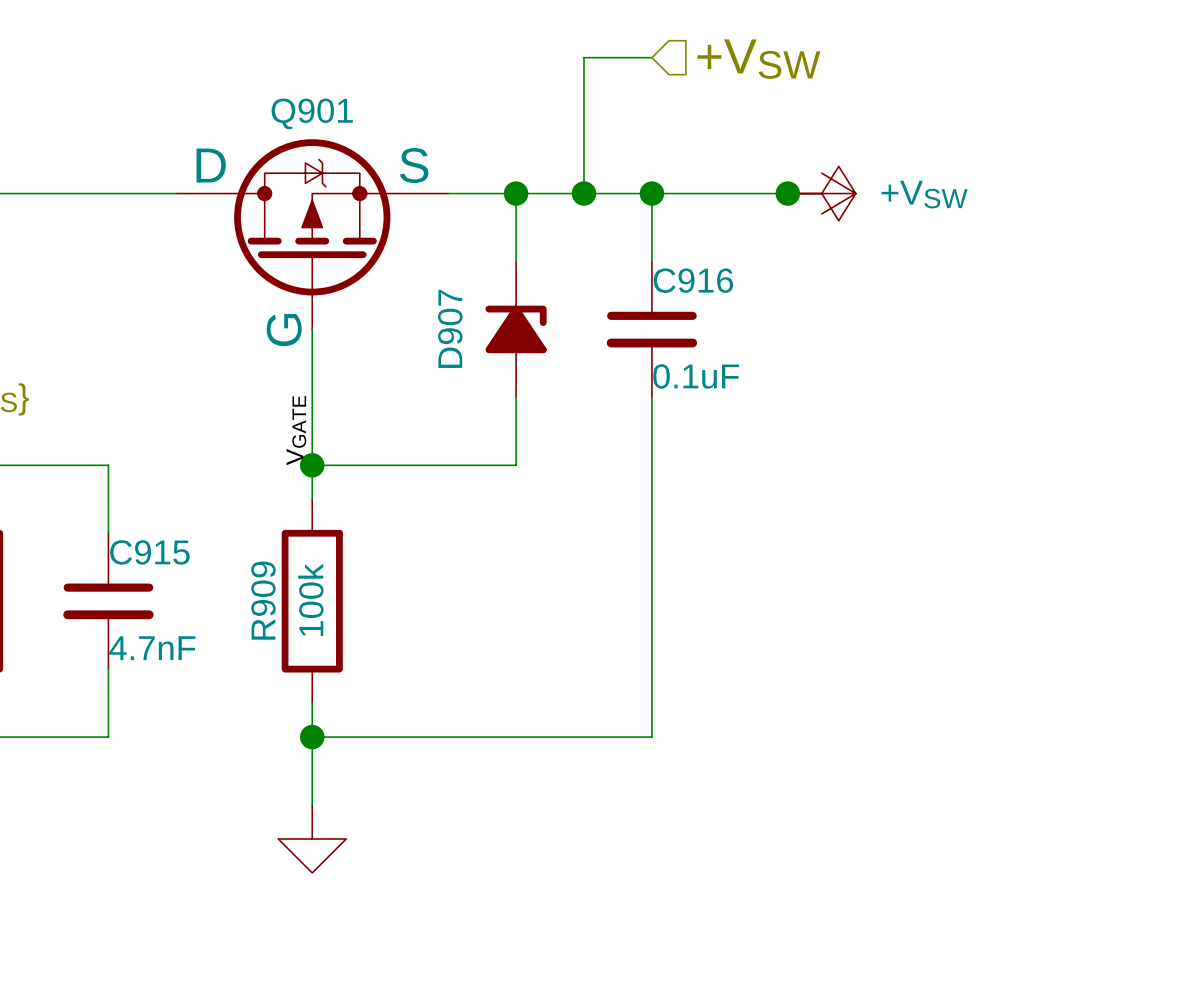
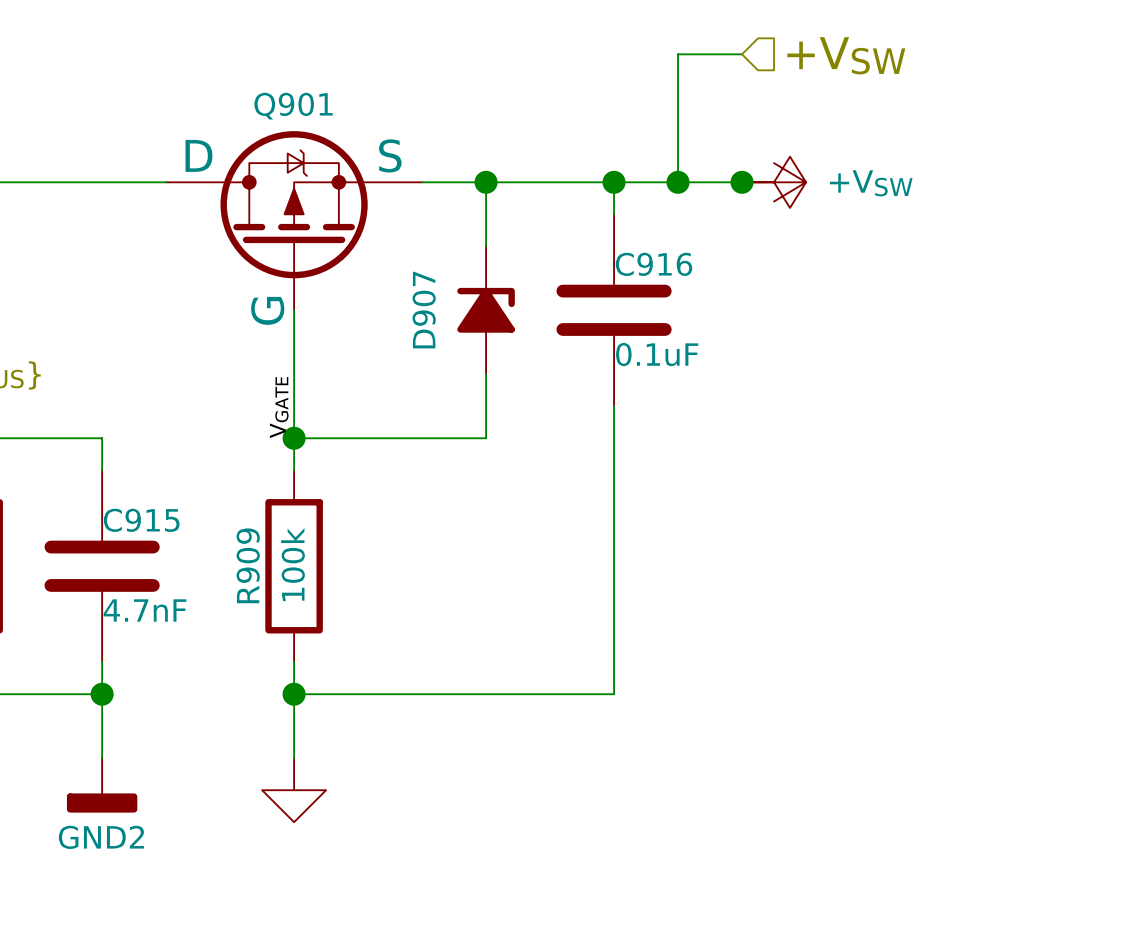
wire: (651, 57) (584, 57) (584, 193) -> (742, 54) (678, 54) (678, 182)
hierarchical label position: +VSW (758, 59) -> +VSW (846, 55)
junction position: (584, 193) -> (678, 182)
C916 symbol: [606, 261, 698, 398] -> [556, 214, 672, 407]
C915 symbol: [63, 533, 154, 670] -> [44, 470, 160, 663]
wire: none -> (102, 694) (102, 758)
junction: none -> (102, 694)
power symbol: none -> GND2 (102, 785)

